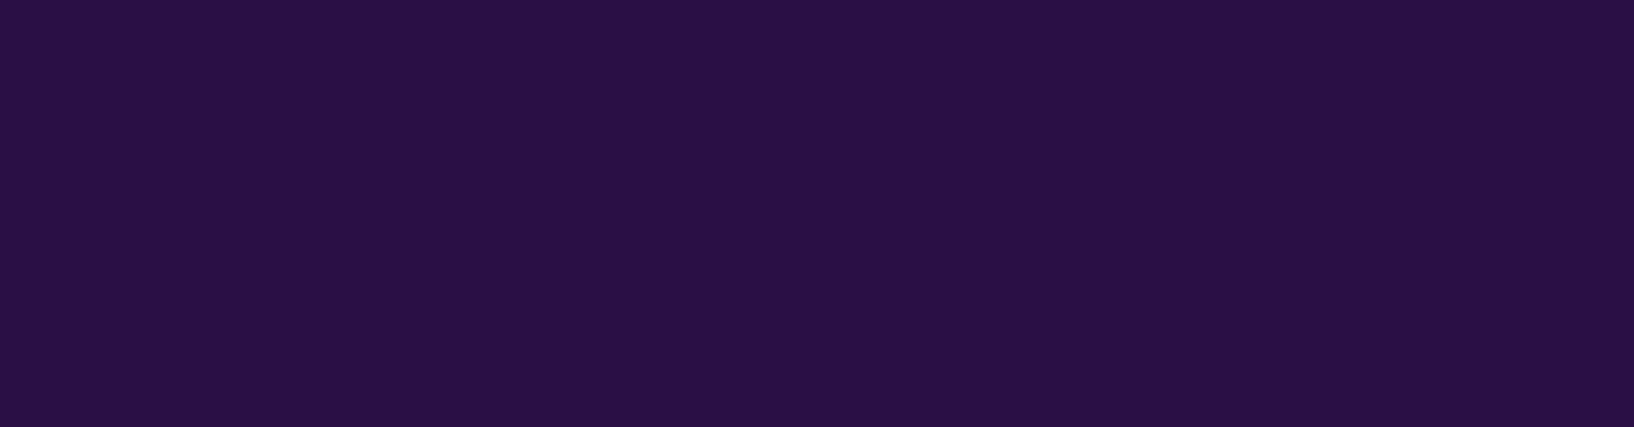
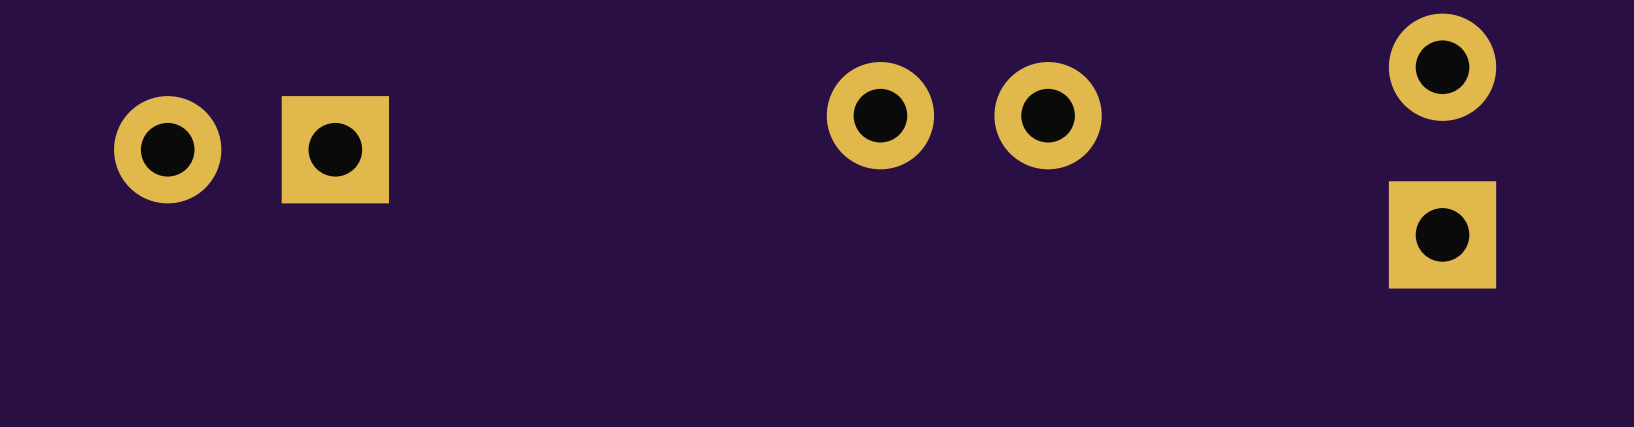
part: none -> (964, 115)
part: none -> (251, 149)
part: none -> (1442, 151)

